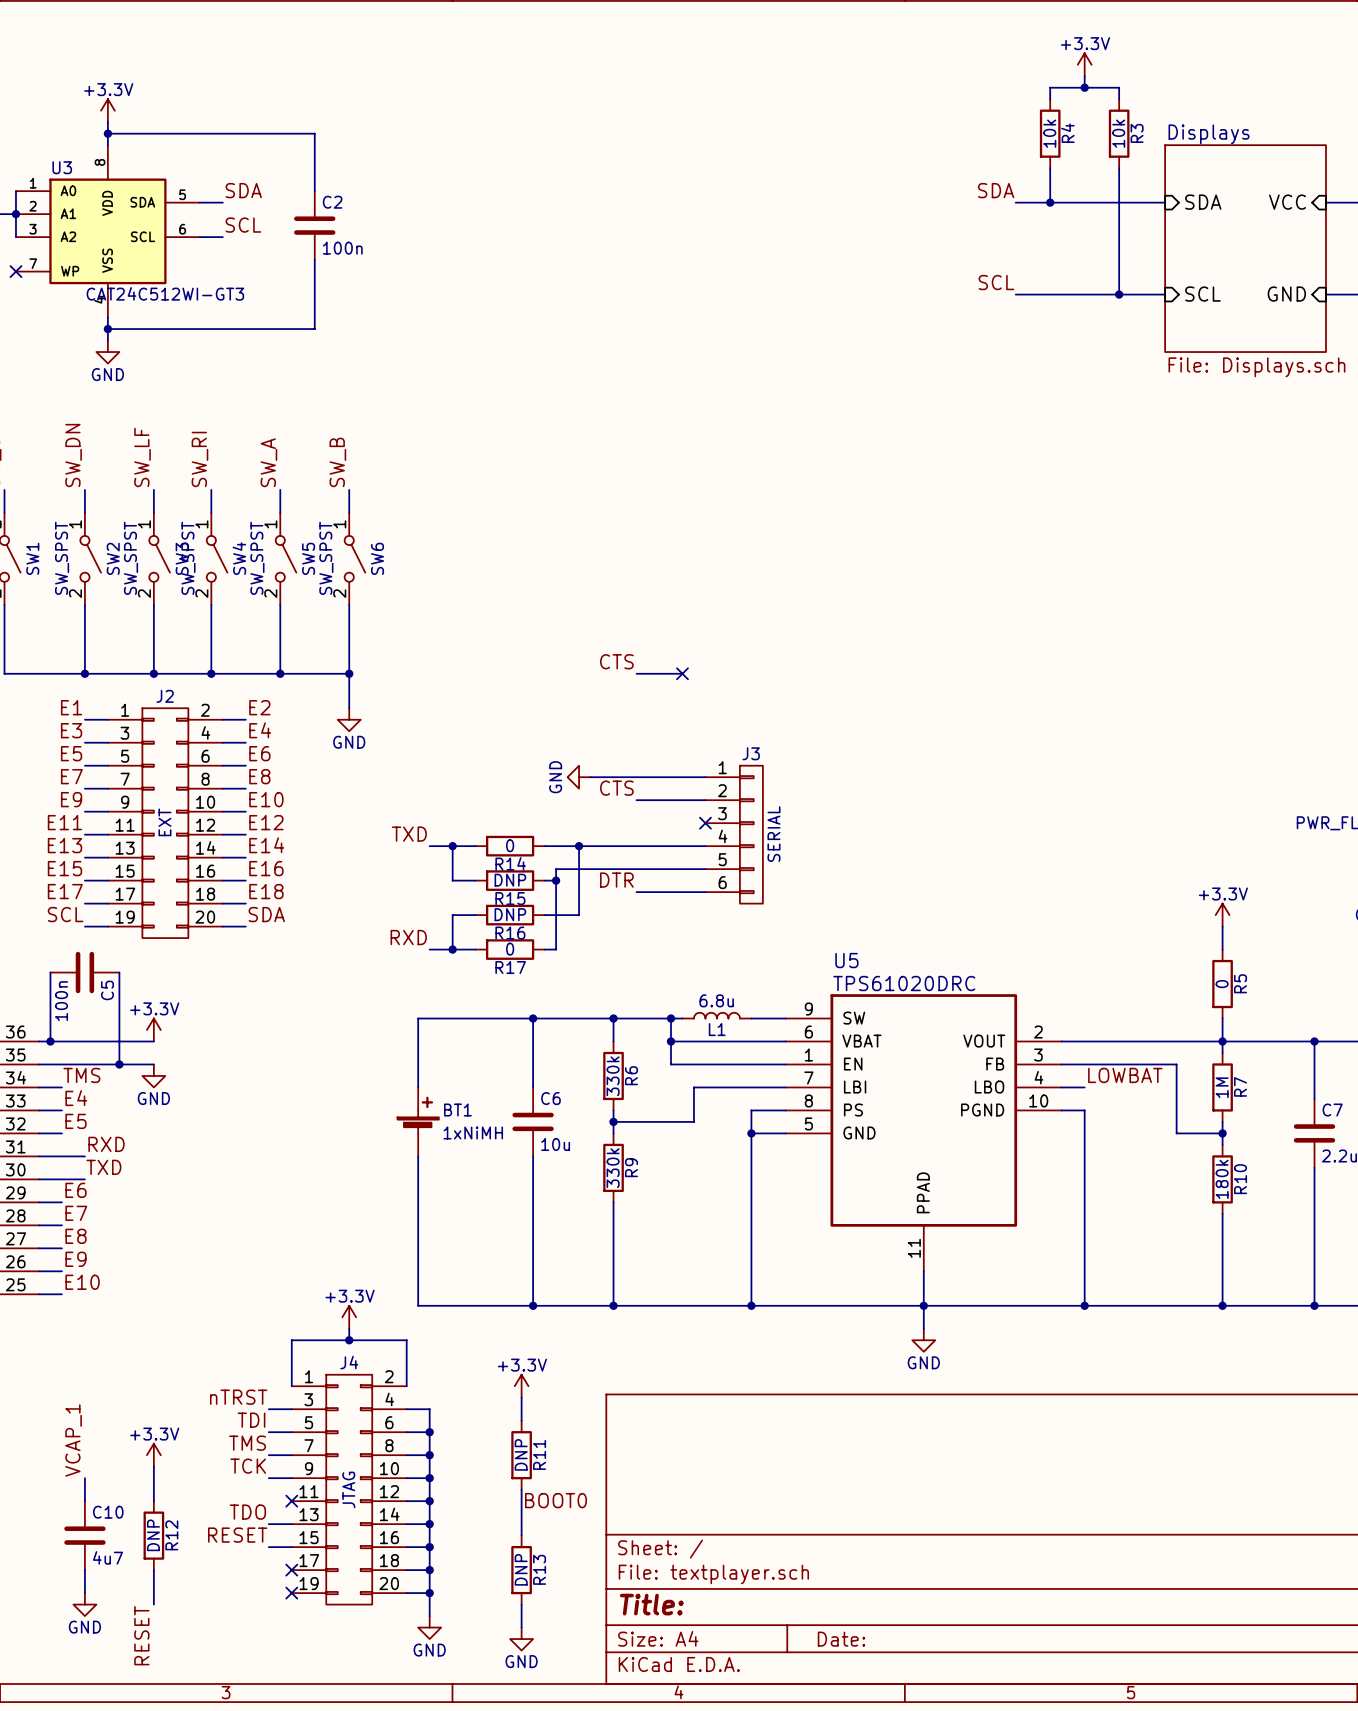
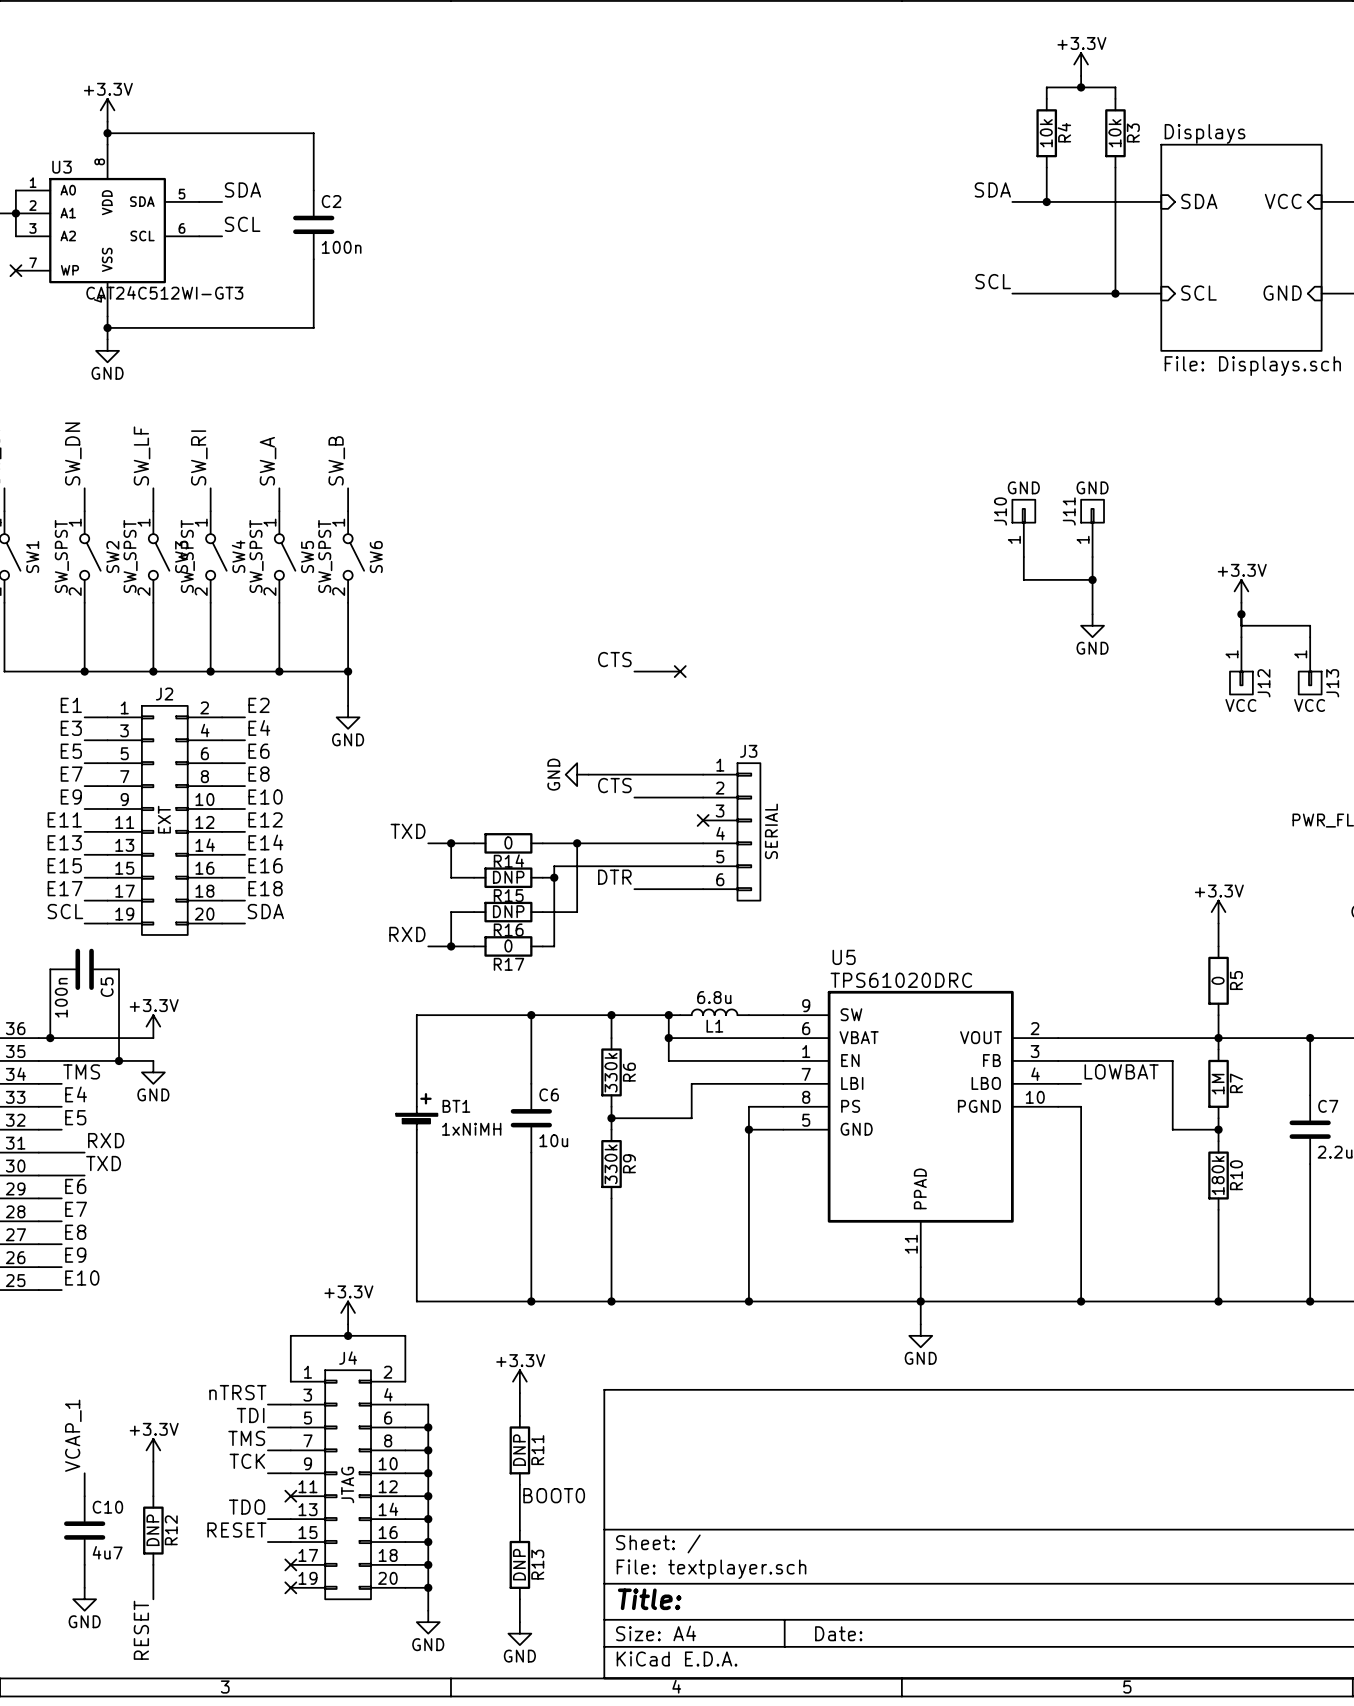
J10: none -> GND (1023, 528)
J11: none -> GND (1092, 528)
wire: none -> (1023, 557) (1023, 579) (1092, 579)
wire: none -> (1092, 557) (1092, 614)
junction: none -> (1092, 579)
power symbol: none -> +3.3V (1241, 591)
wire: none -> (1241, 602) (1241, 637)
junction: none -> (1241, 614)
power symbol: none -> GND (1092, 625)
wire: none -> (1241, 625) (1310, 625) (1310, 637)
J12: none -> VCC (1241, 665)
J13: none -> VCC (1310, 665)

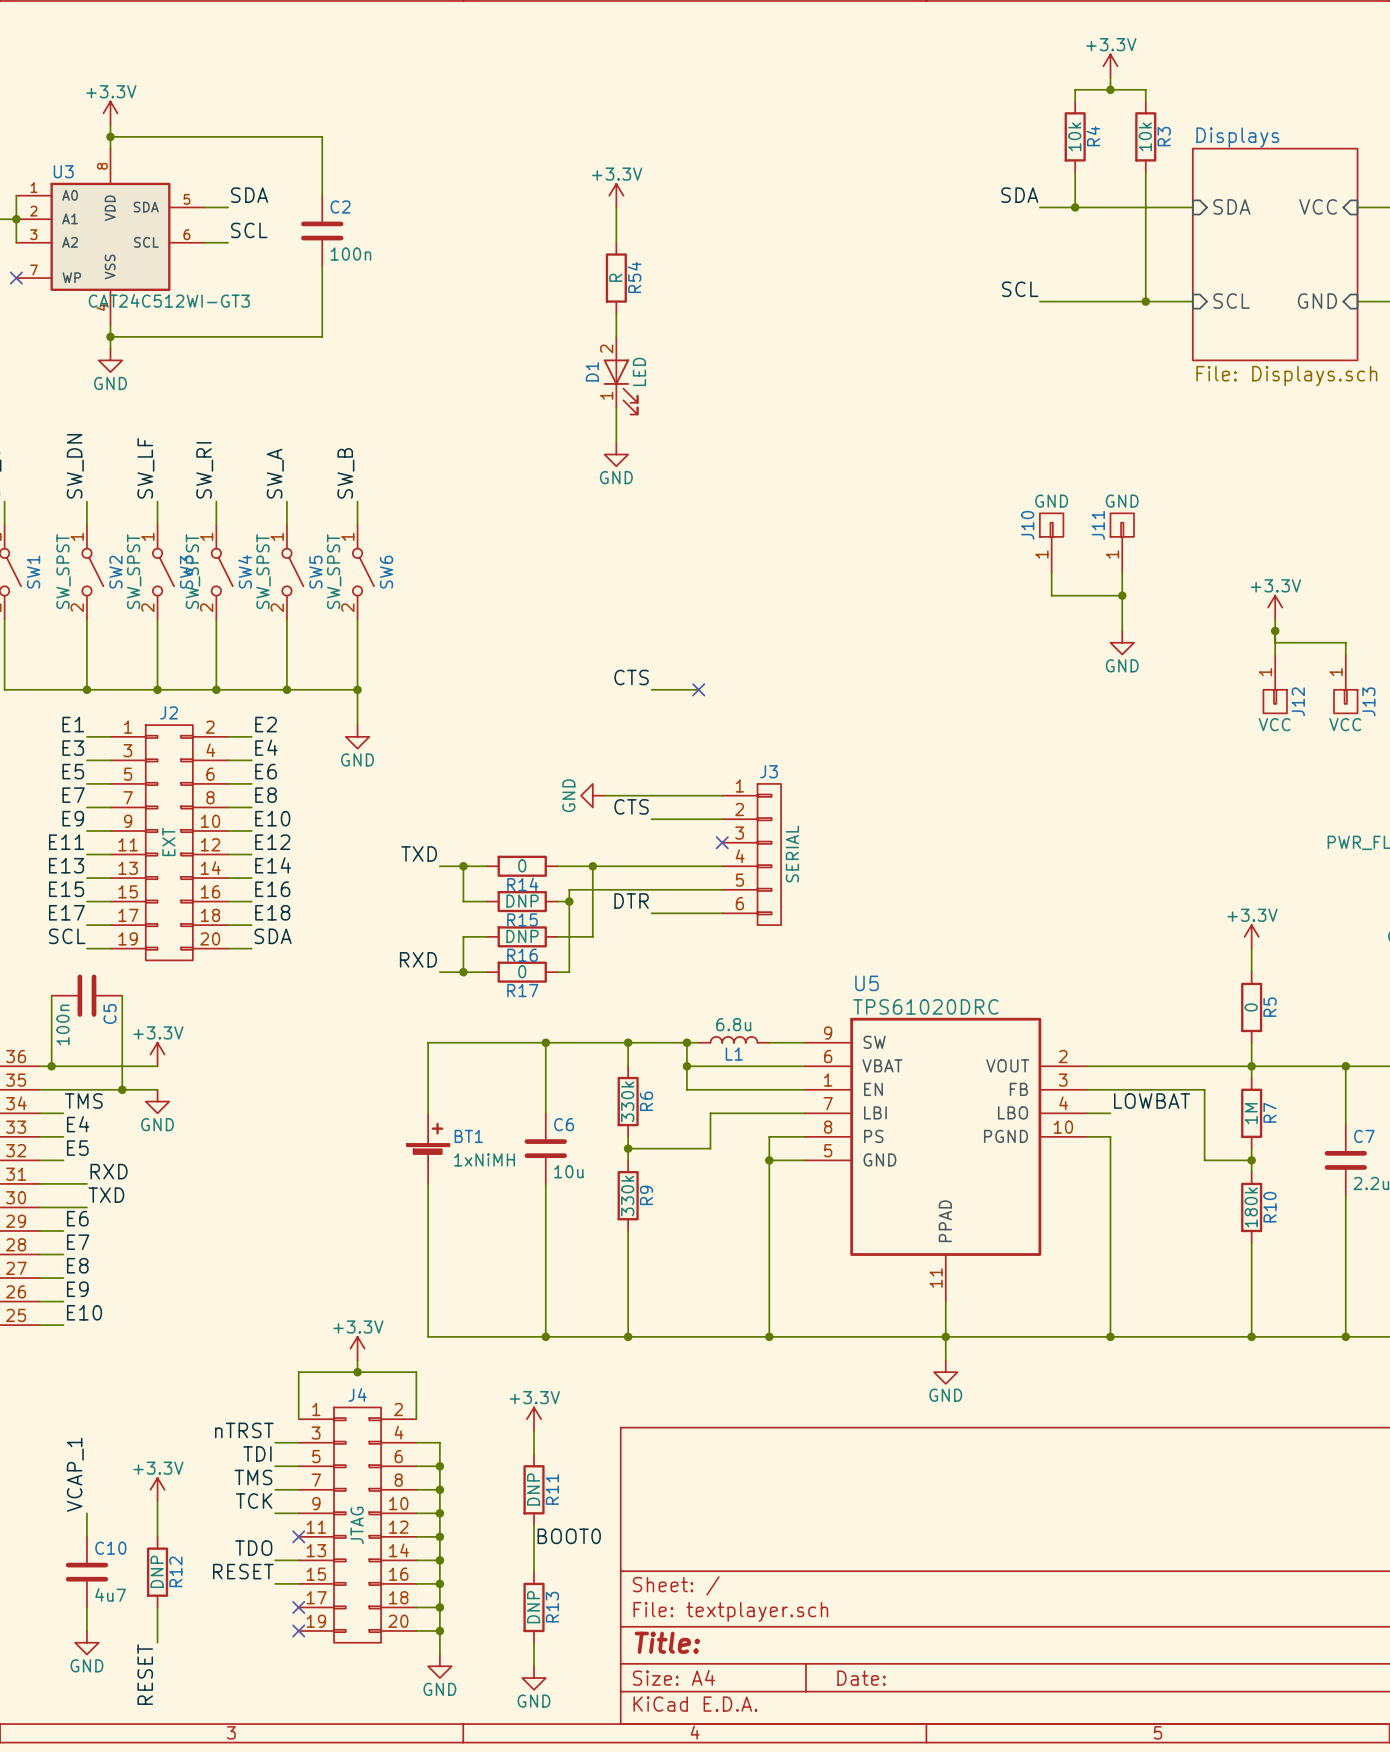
power symbol: none -> +3.3V (616, 195)
wire: none -> (616, 207) (616, 242)
R54: none -> R (616, 278)
wire: none -> (616, 313) (616, 336)
D1: none -> LED (620, 375)
wire: none -> (616, 407) (616, 442)
power symbol: none -> GND (616, 454)

